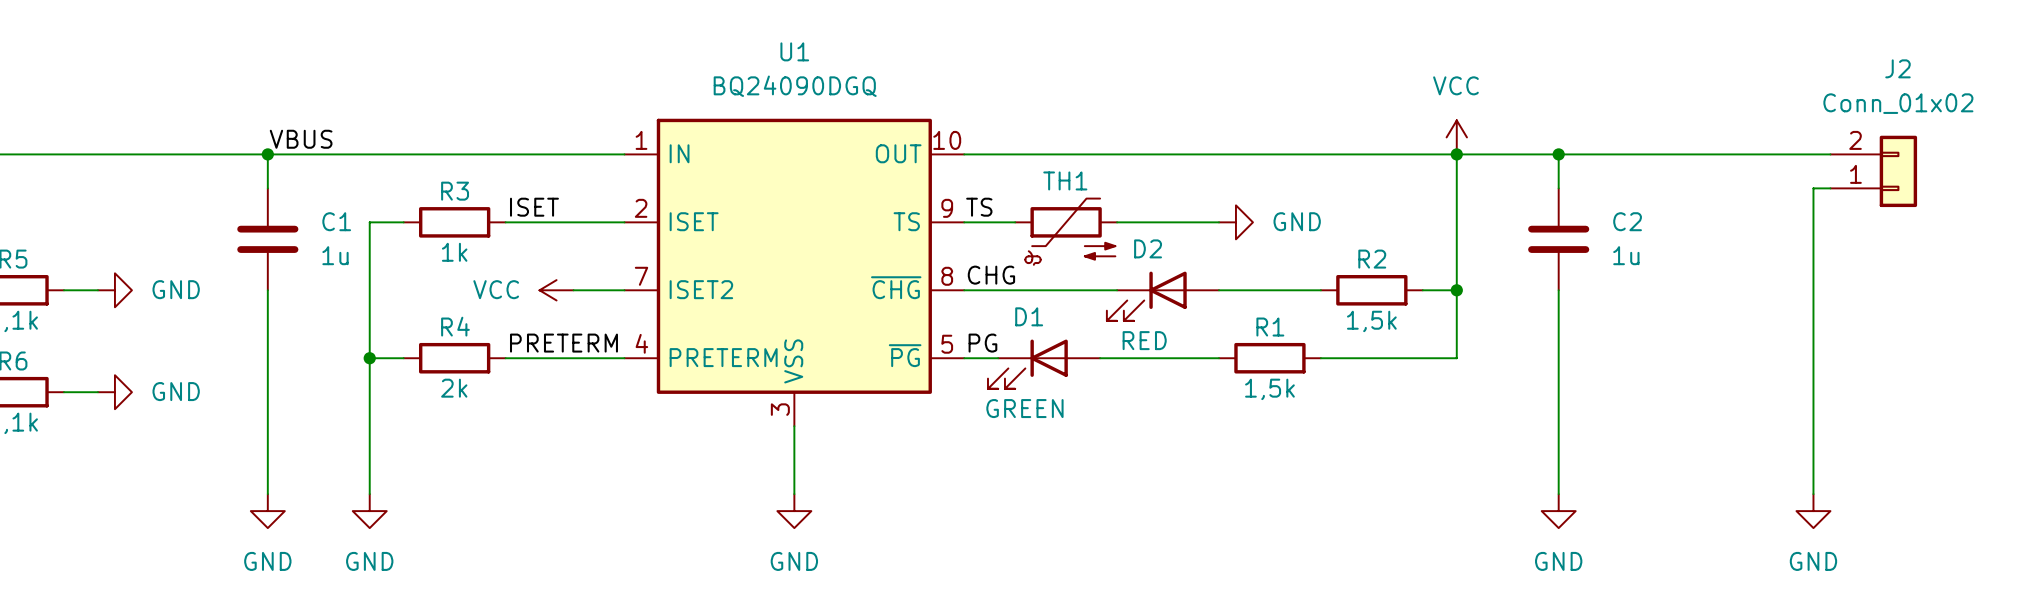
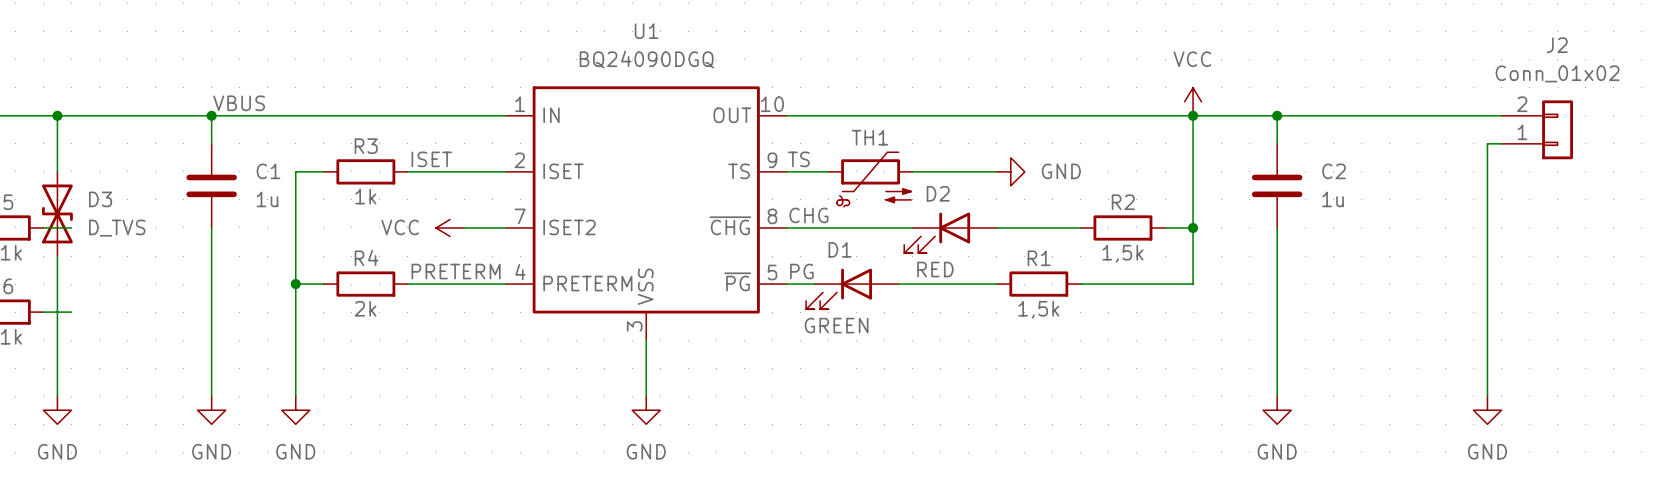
wire: none -> (57, 115) (57, 171)
junction: none -> (57, 115)
D3: none -> D_TVS (57, 213)
power symbol: GND (114, 290) -> none
wire: none -> (57, 256) (57, 396)
power symbol: GND (114, 392) -> none
power symbol: none -> GND (57, 410)

